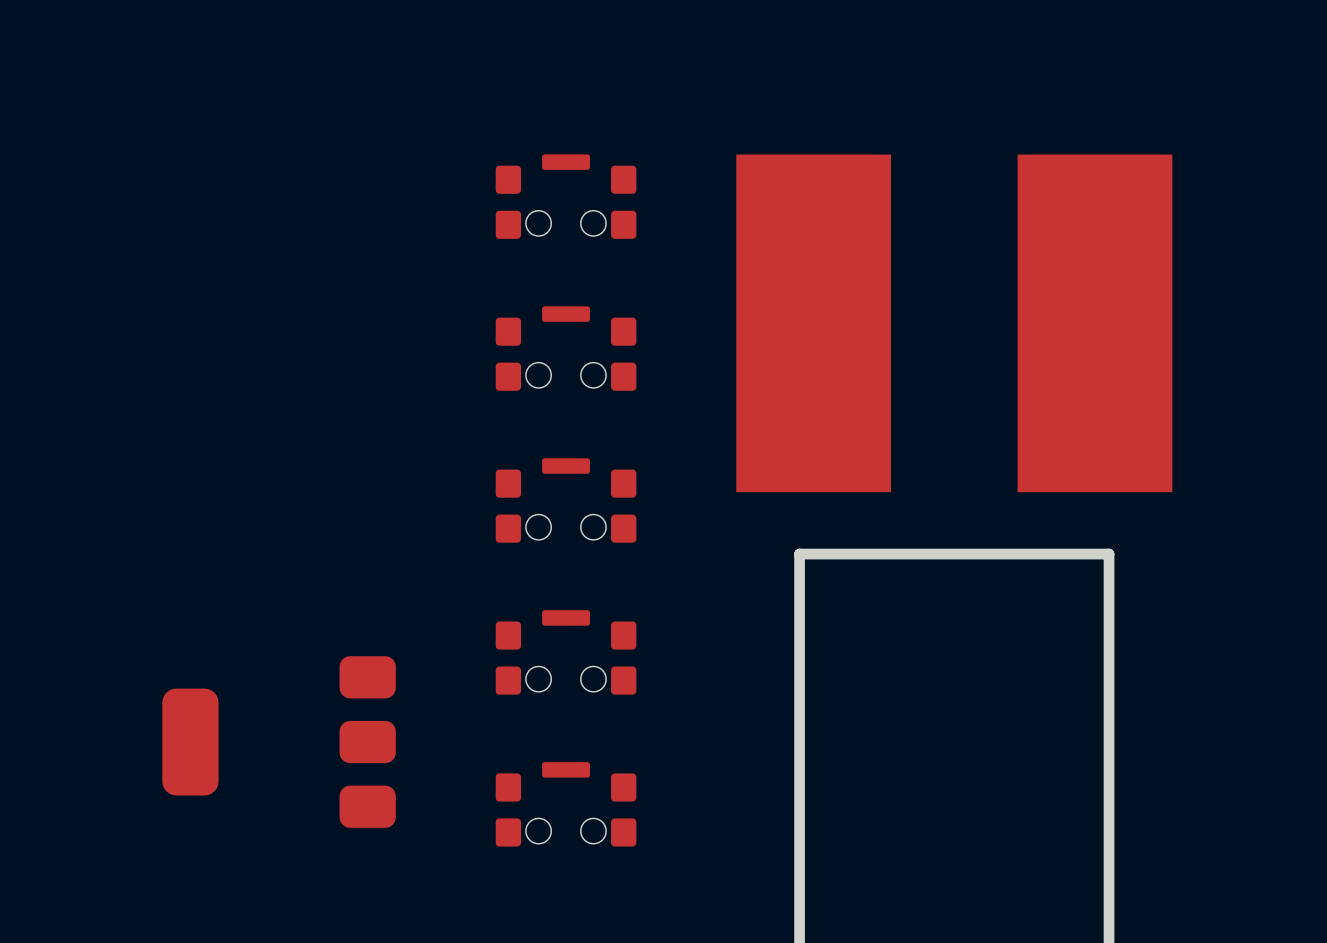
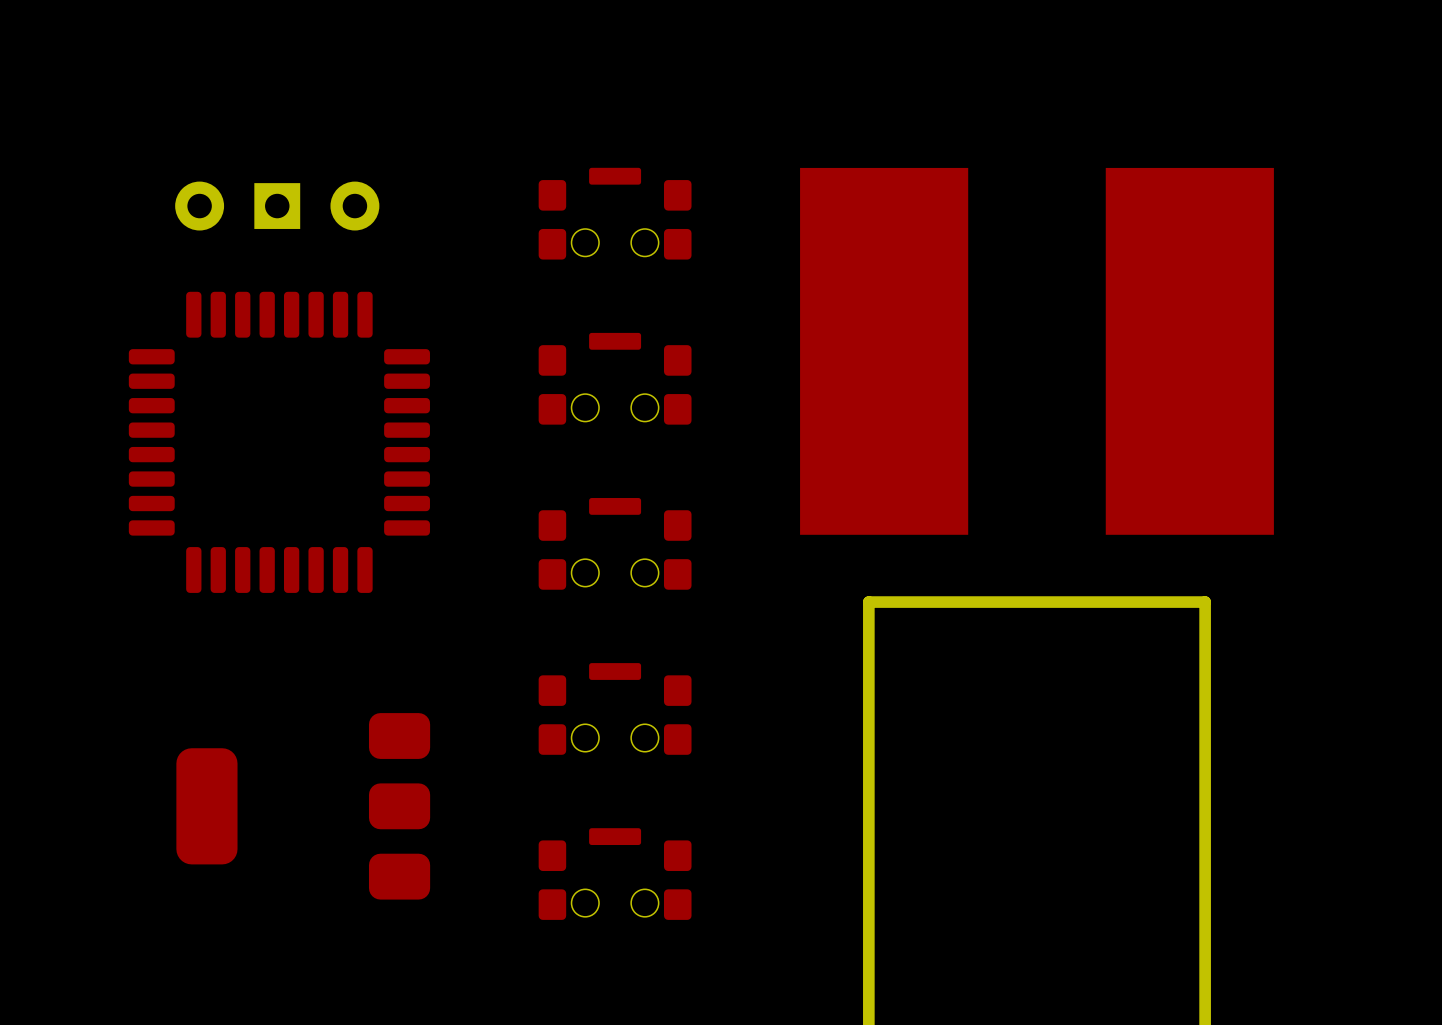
part: none -> (277, 206)
part: none -> (279, 442)

